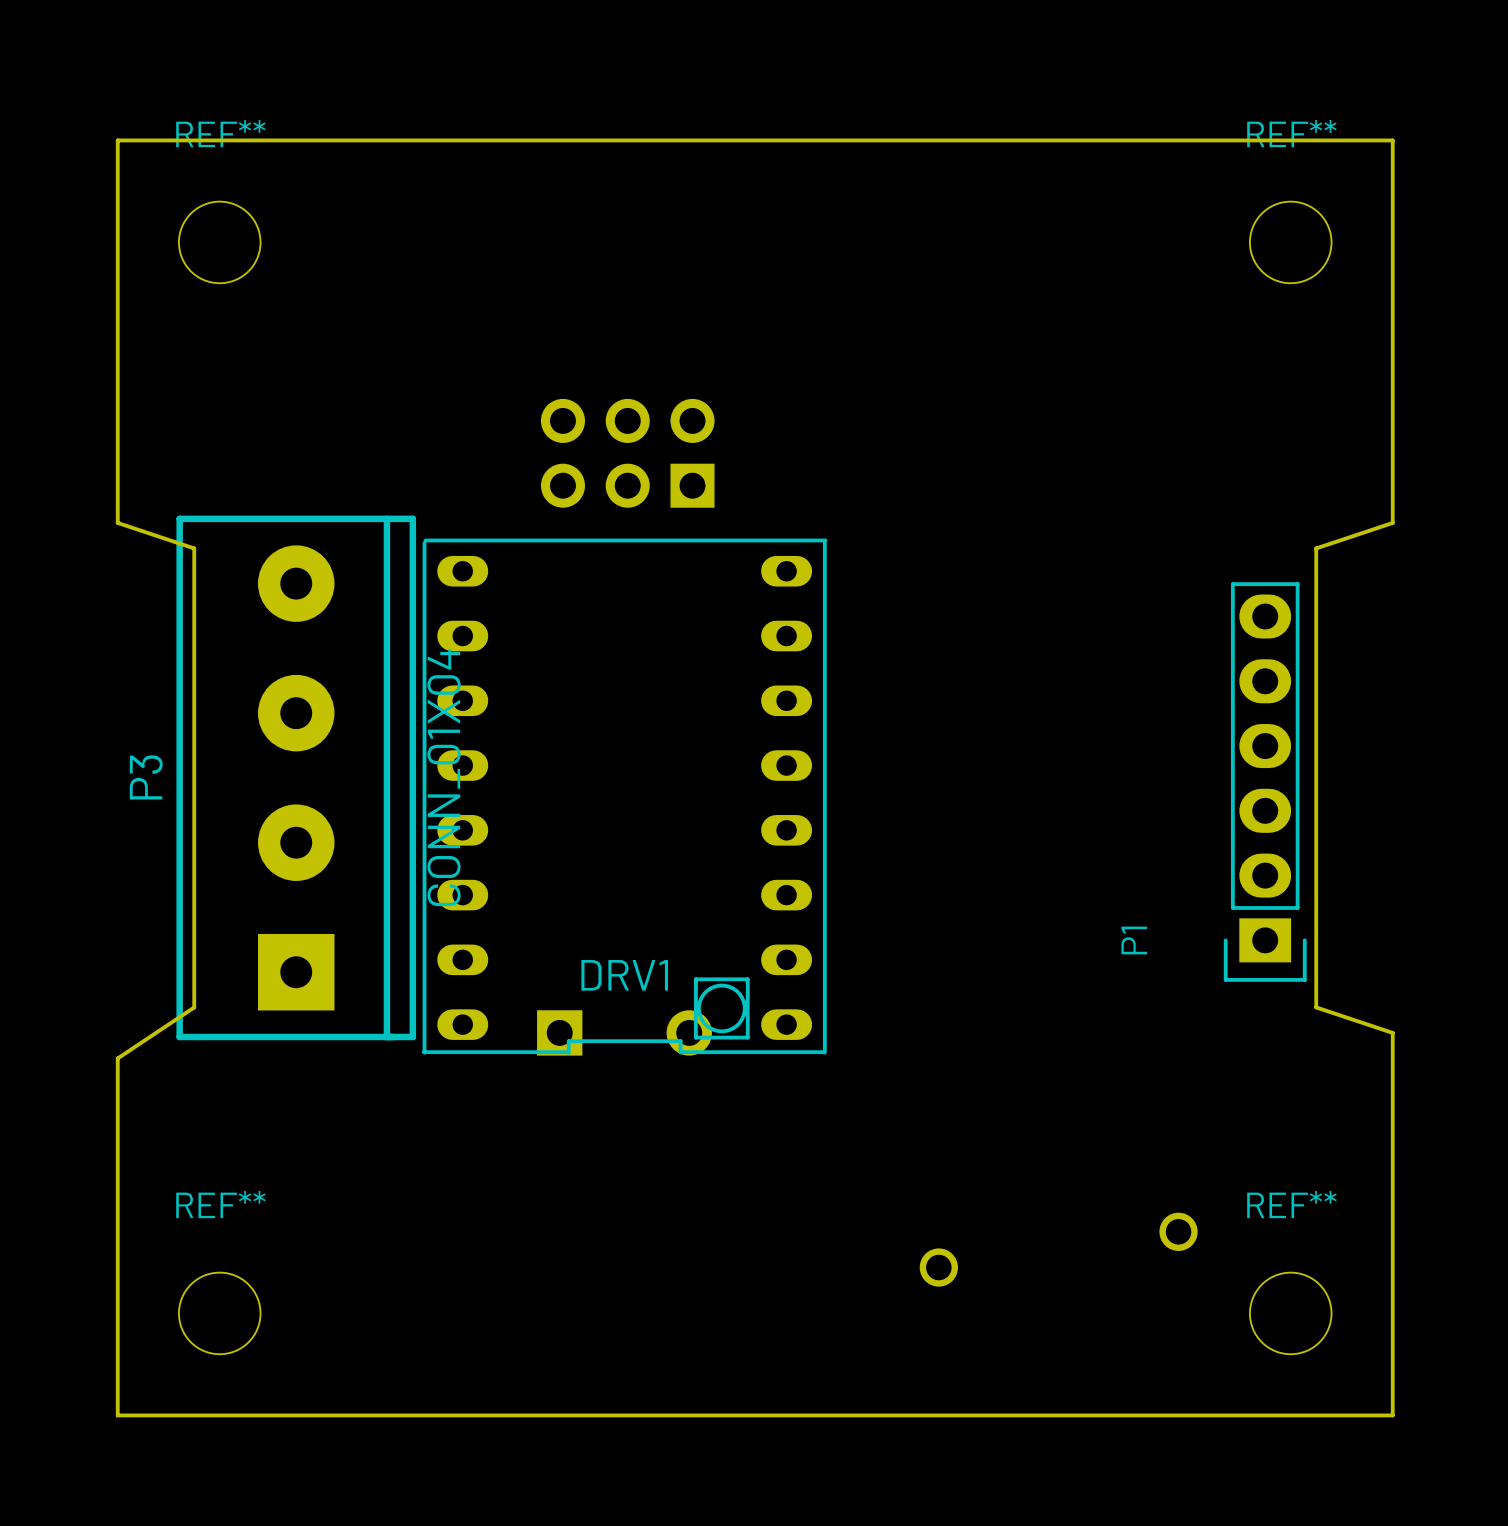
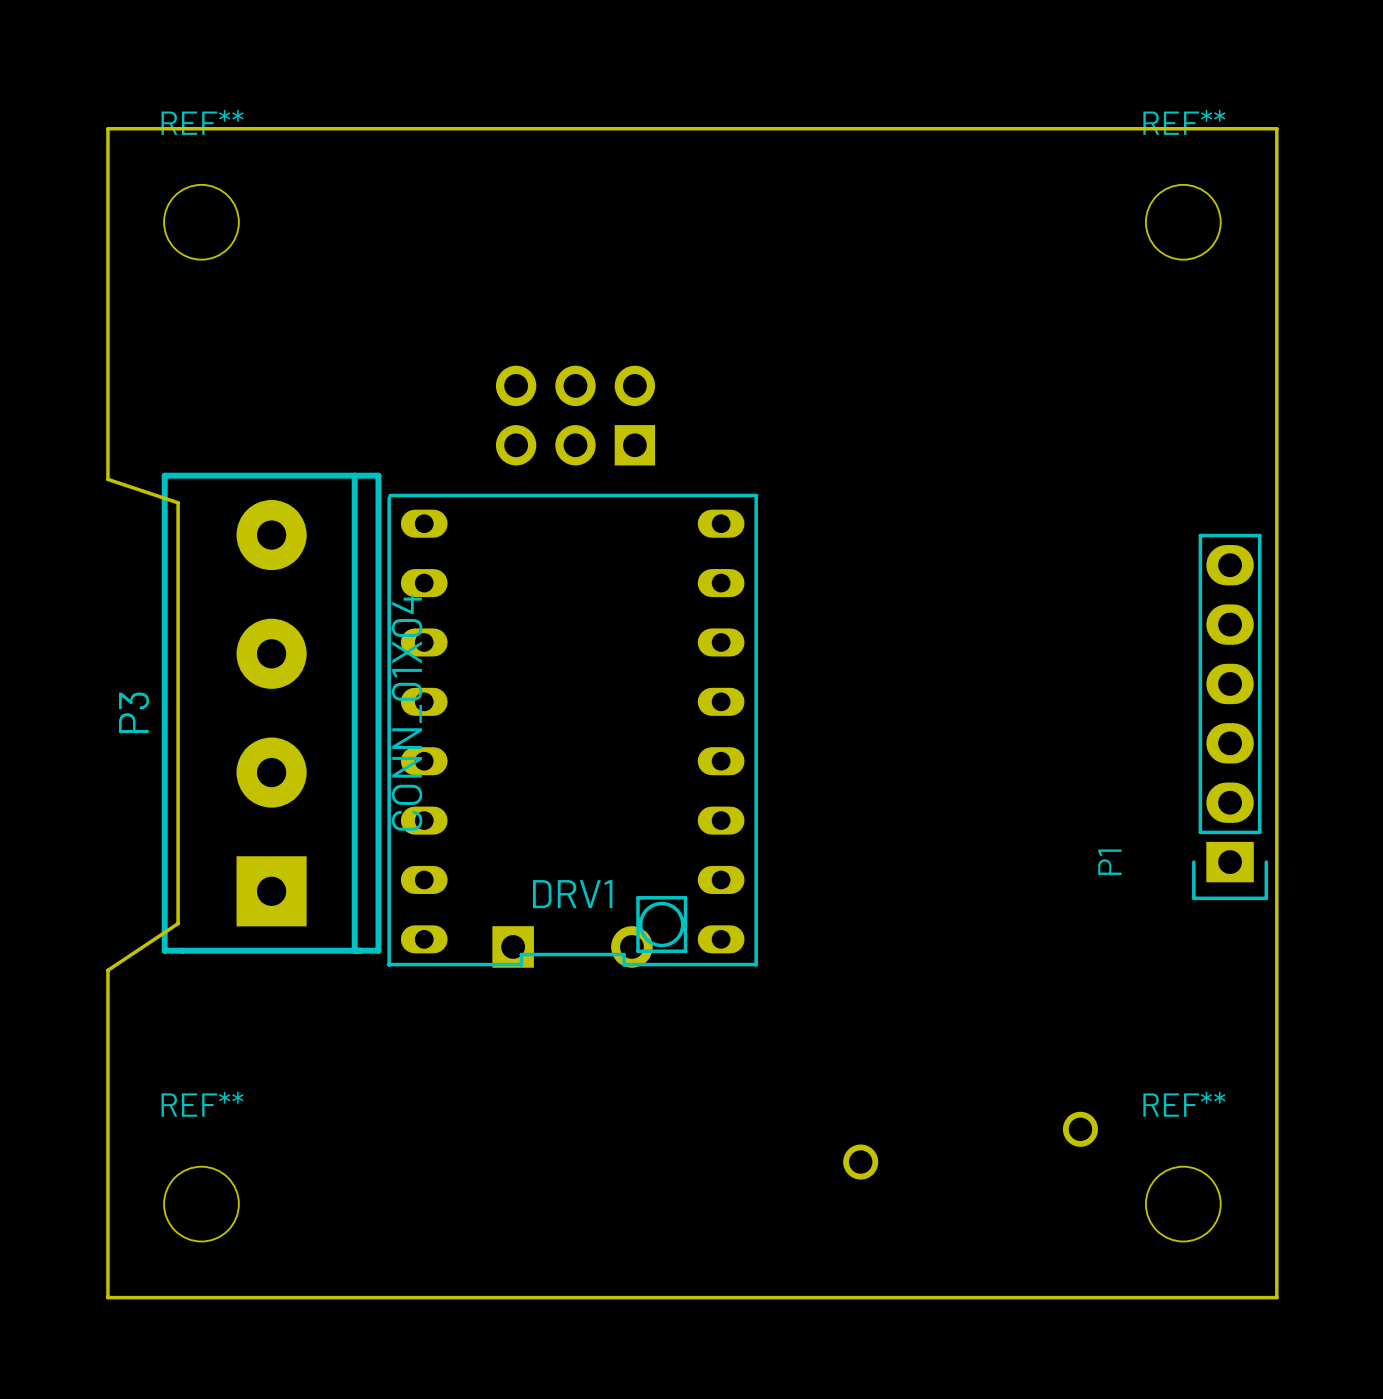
board edge: (1392, 522) (1316, 548) (1316, 1007) (1392, 1032) -> (1276, 479) (1276, 946)
P1 position: (1265, 782) -> (1230, 716)

